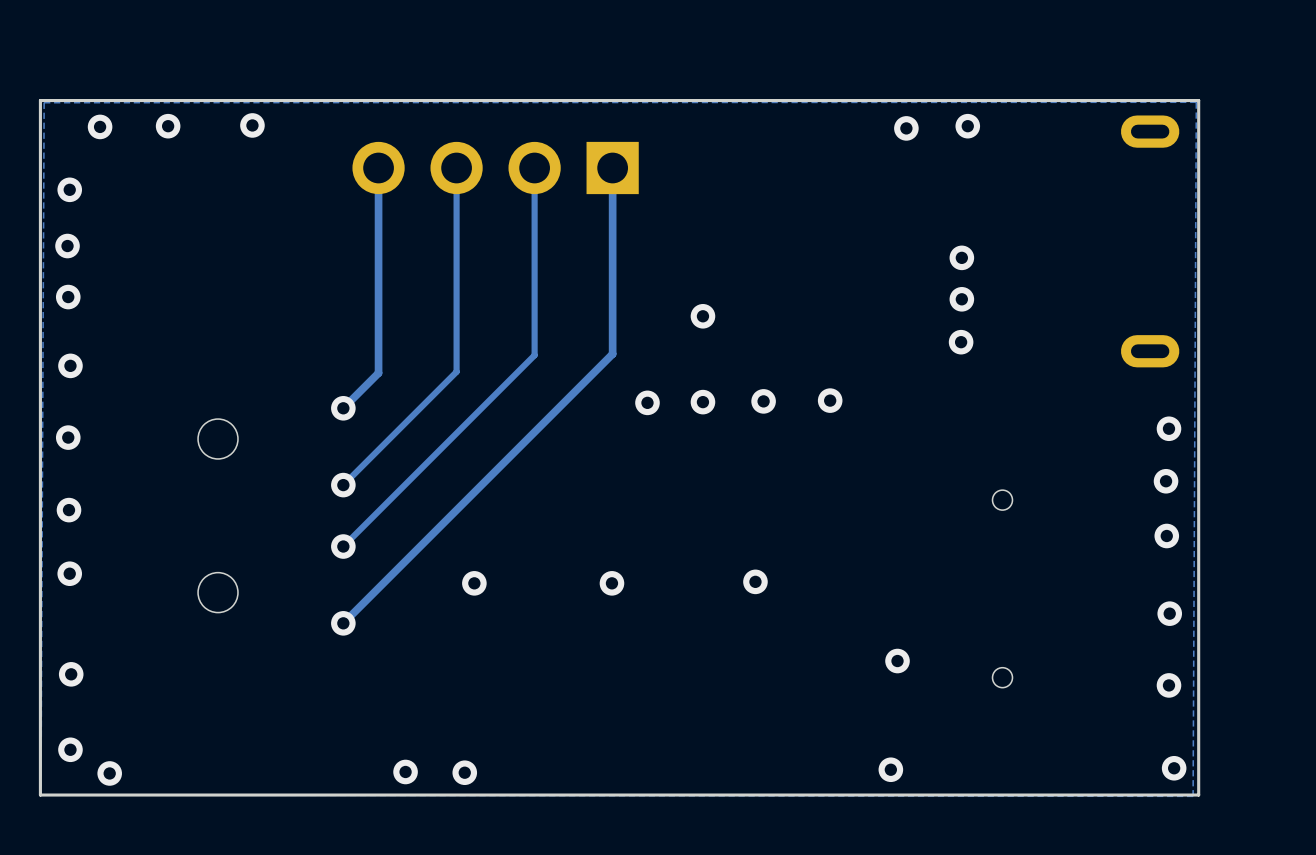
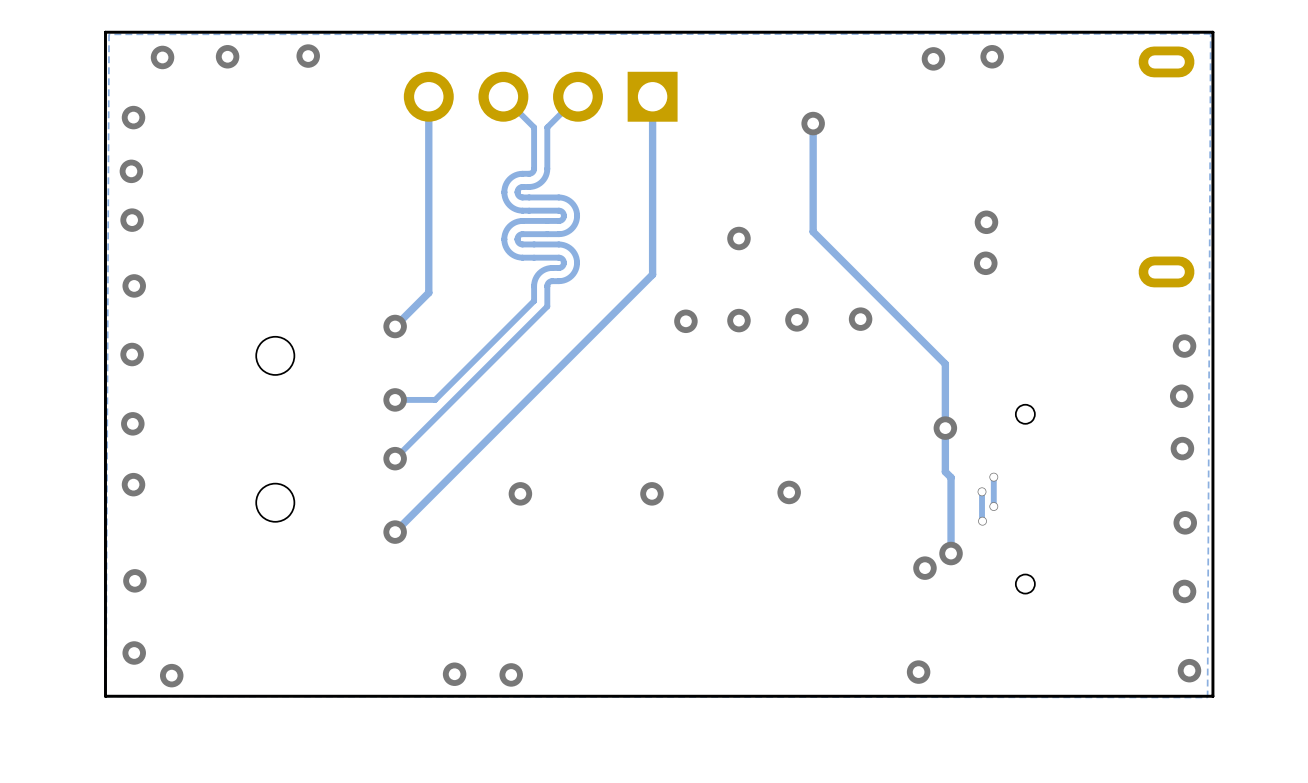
track: (456, 168) (456, 371) (343, 485) -> (563, 263) (561, 267) (547, 268) (539, 273) (534, 283) (534, 301) (435, 399) (395, 399)
track: none -> (503, 96) (534, 127) (533, 170) (530, 173) (517, 174) (511, 177) (506, 182) (504, 191)
track: (534, 168) (534, 355) (502, 387) -> (578, 96) (547, 127) (547, 168) (544, 177) (538, 184) (520, 187) (517, 191)
track: none -> (813, 123) (813, 231) (945, 364) (945, 471) (951, 477) (951, 553)
via: none -> (813, 123)
via: (961, 257) -> none
track: none -> (504, 192) (508, 203) (515, 209) (559, 210) (563, 215)
track: none -> (517, 192) (521, 197) (565, 198) (574, 206) (577, 215)
track: none -> (563, 215) (559, 220) (515, 222) (506, 230) (504, 239)
track: none -> (577, 215) (574, 225) (565, 232) (521, 234) (517, 239)
track: none -> (504, 239) (508, 250) (515, 256) (559, 257) (563, 262)
track: none -> (517, 239) (521, 244) (565, 245) (574, 253) (577, 262)
track: none -> (577, 263) (574, 272) (569, 277) (548, 283) (547, 306)
via: none -> (945, 428)
track: none -> (993, 477) (993, 506)
via: none -> (993, 477)
track: none -> (982, 491) (982, 521)
via: none -> (982, 491)
via: none -> (993, 506)
via: none -> (982, 521)
via: none -> (951, 553)

